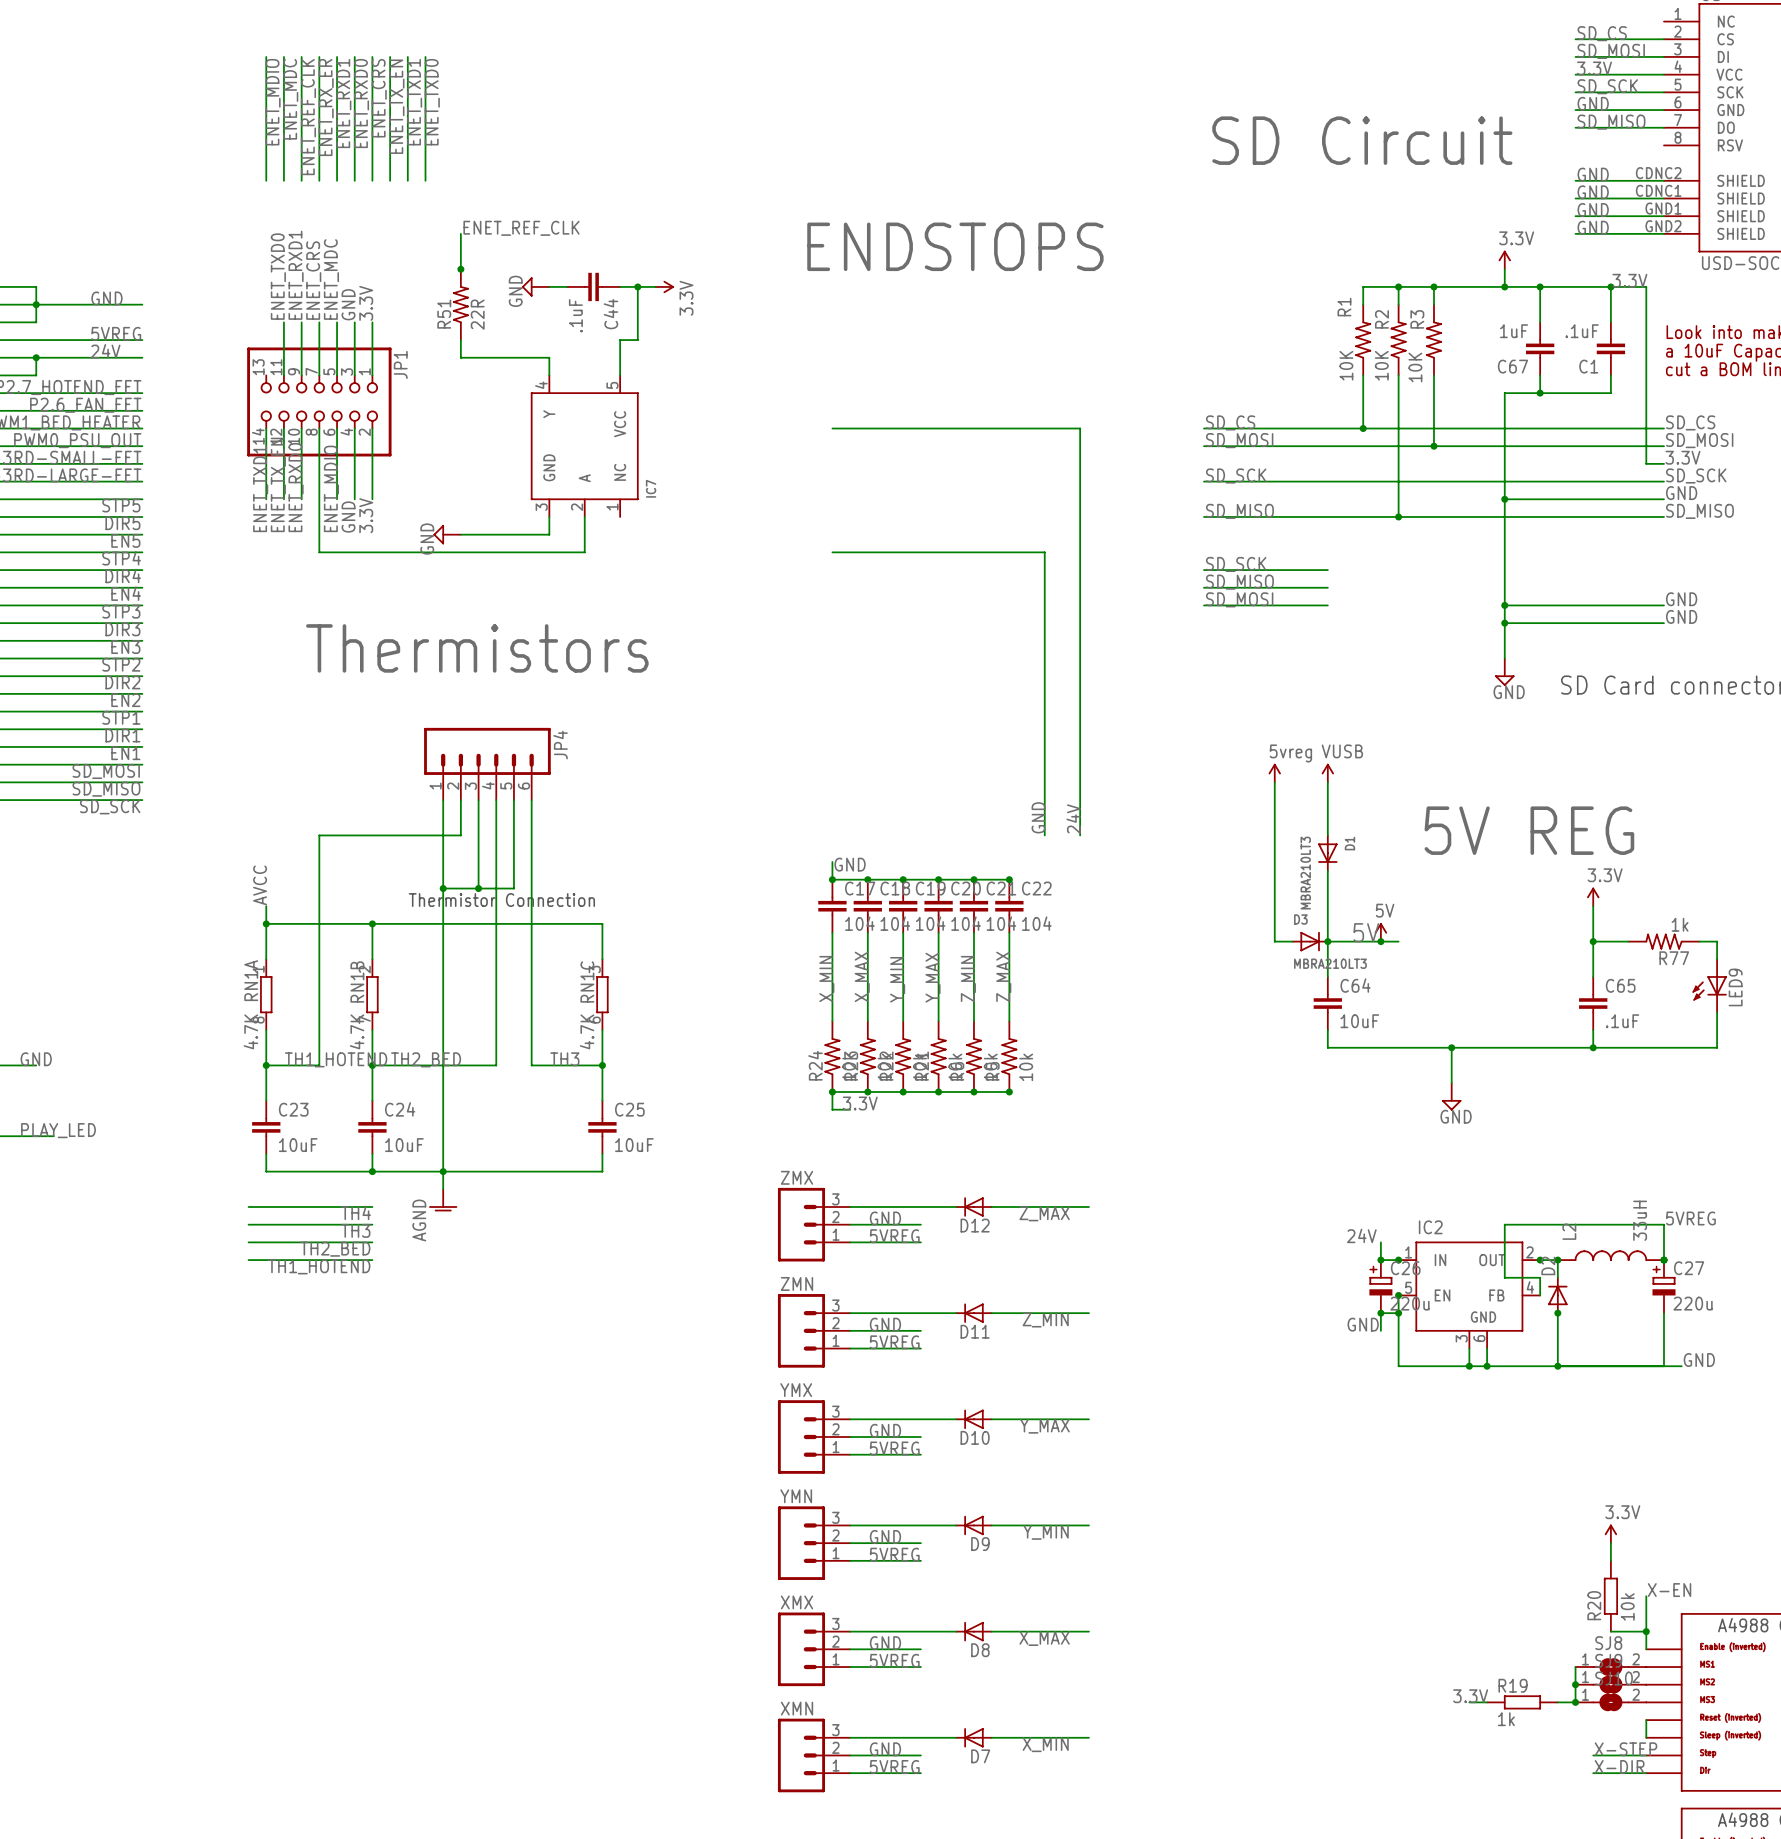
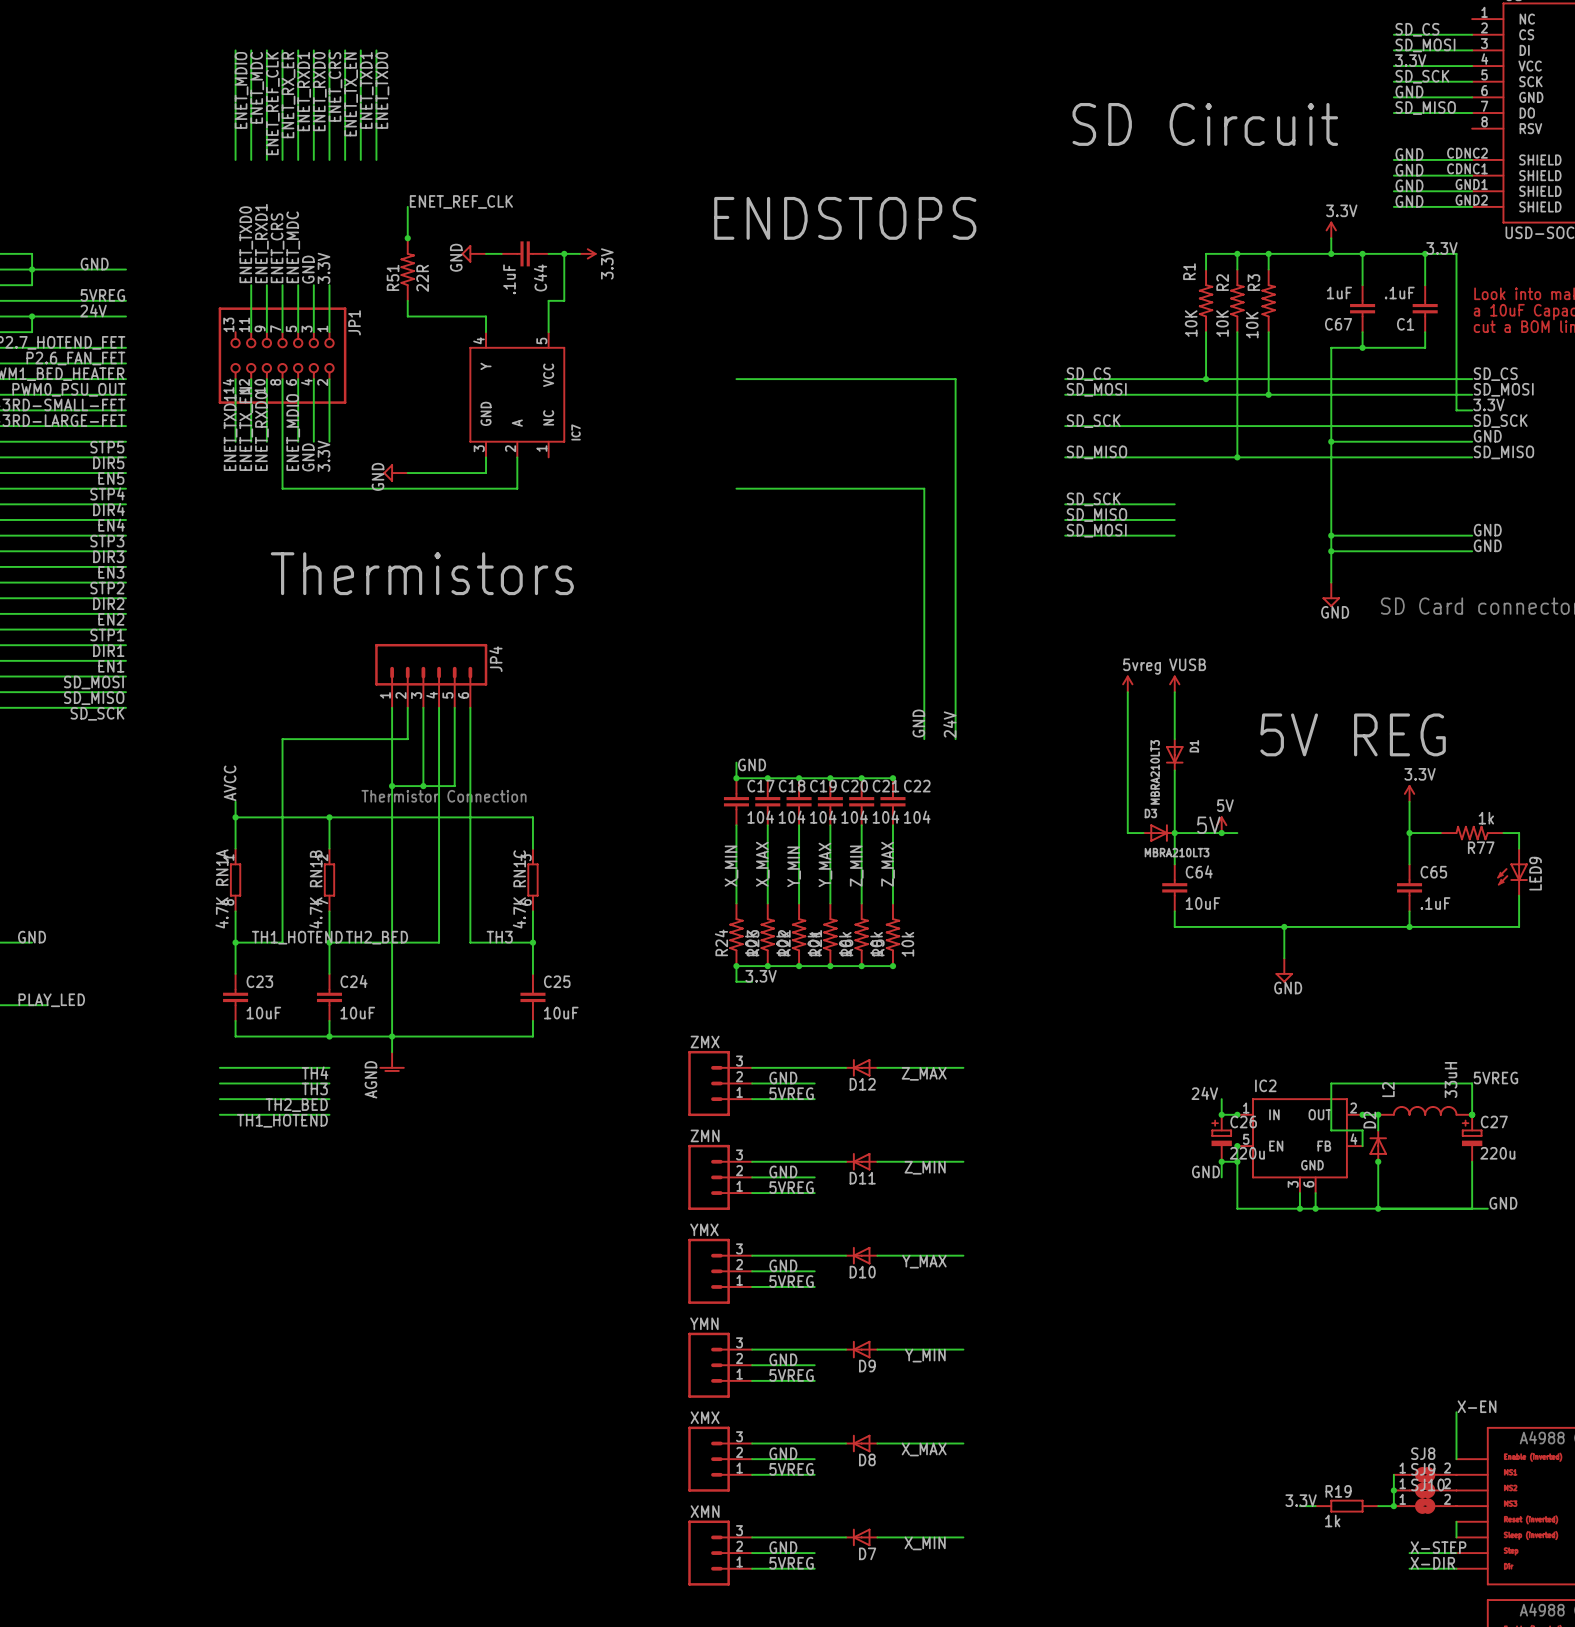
power symbol: 3.3V (1610, 1533) -> none
wire: (1610, 1543) (1610, 1560) -> none
R20: 10k (1610, 1596) -> none
wire: (1610, 1631) (1646, 1631) -> none
junction: (1646, 1631) -> none

